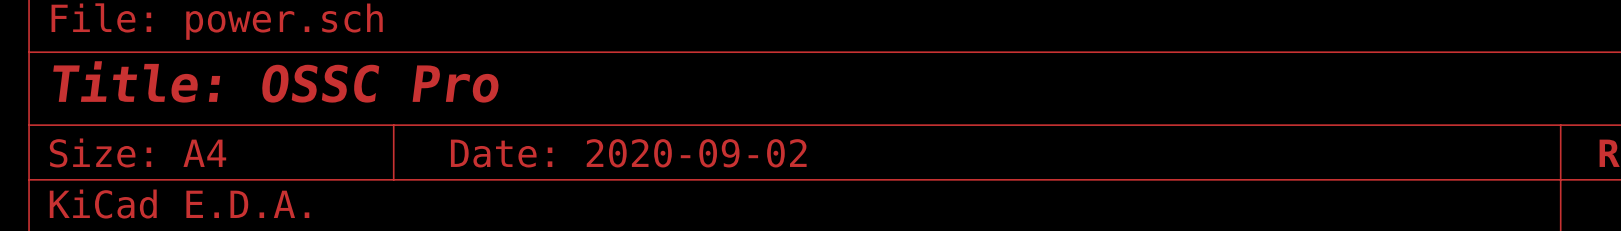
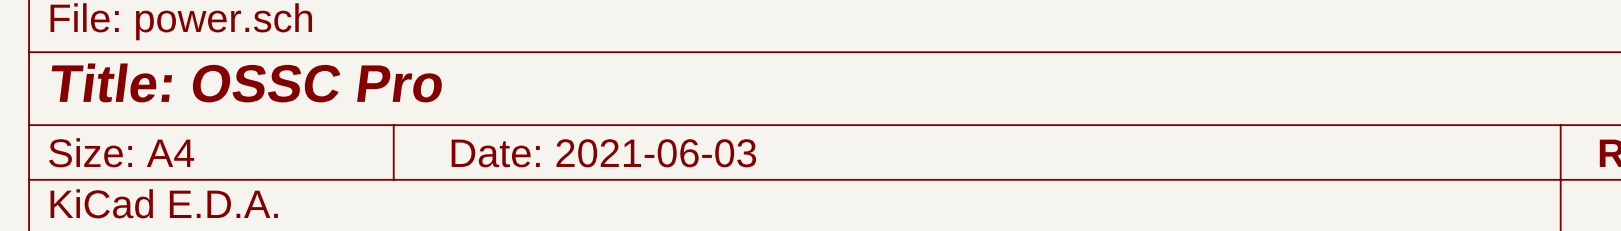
title block: Date: 2020-09-02 (628, 153) -> Date: 2021-06-03 (603, 153)

